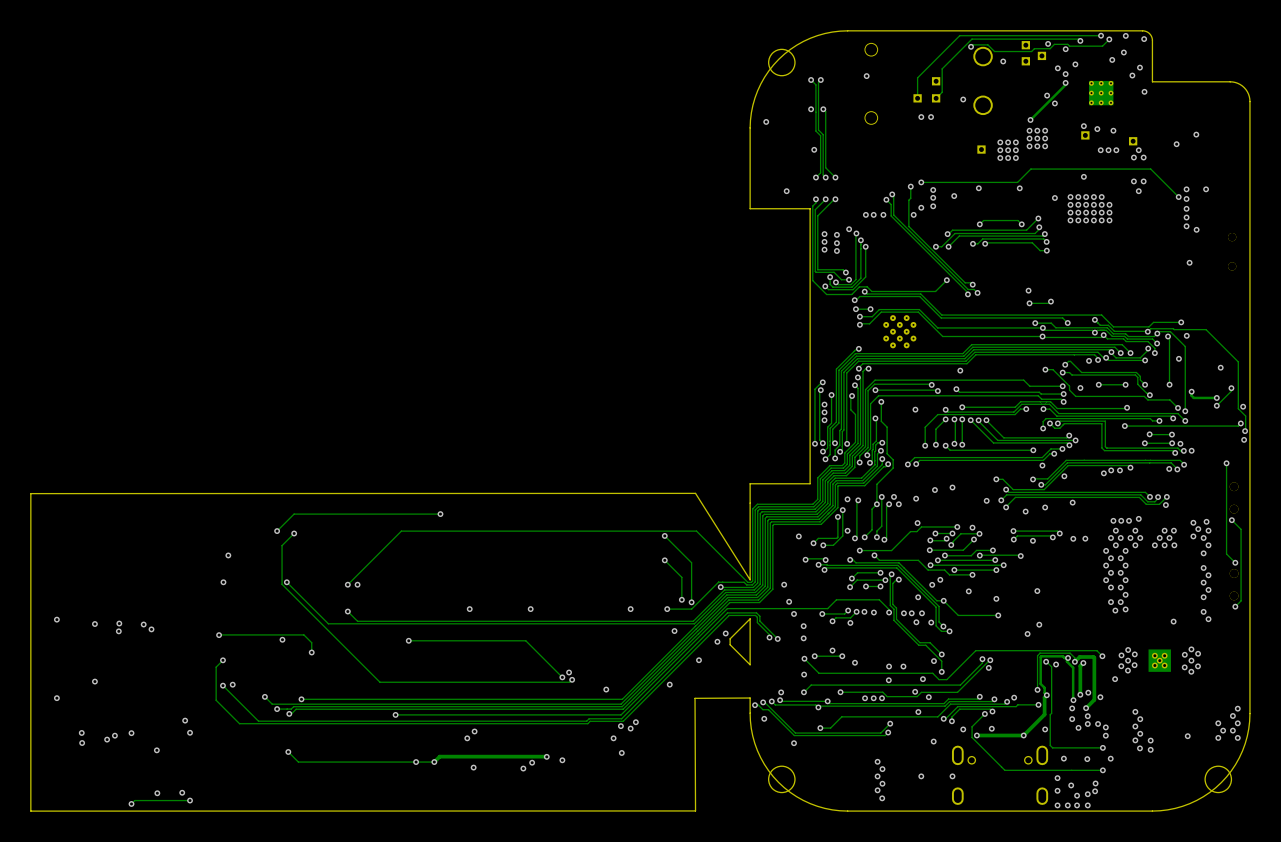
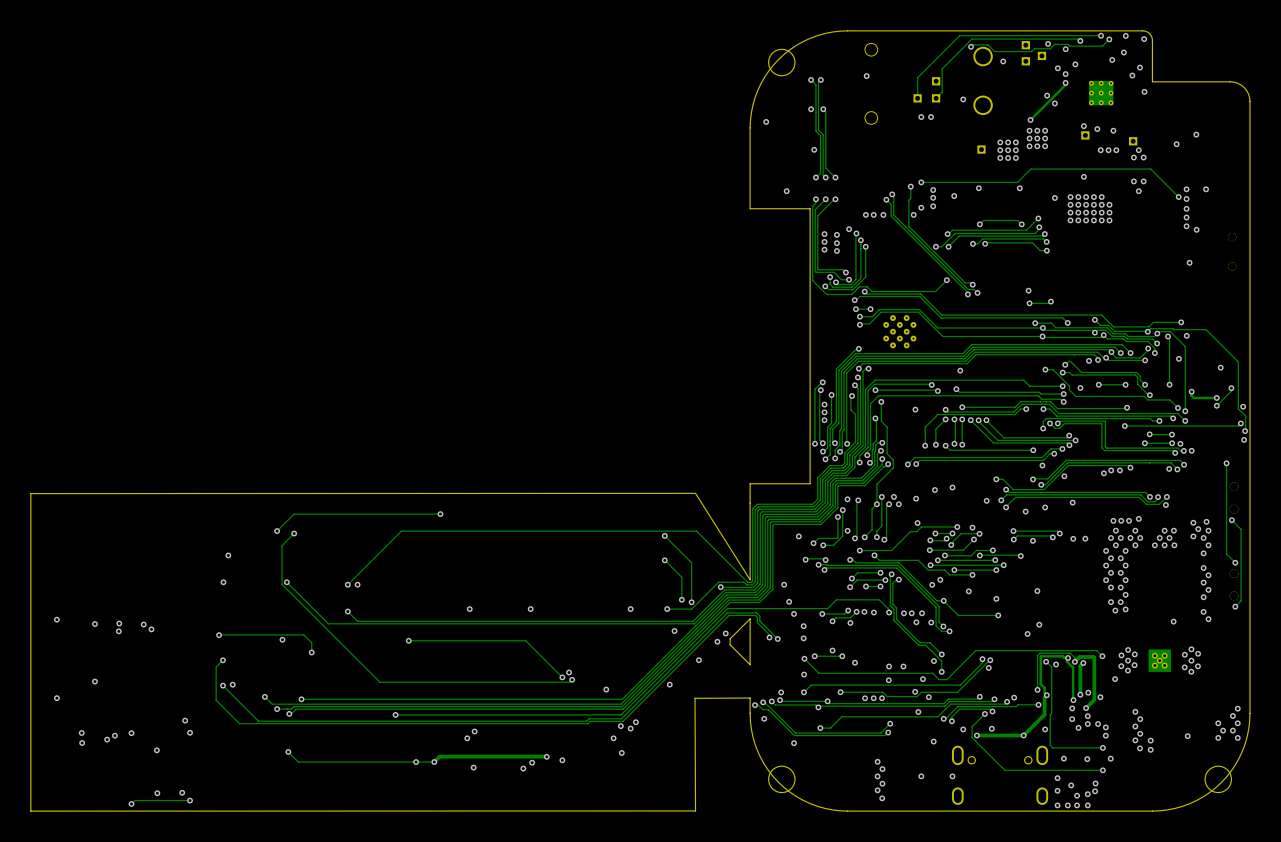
via: (918, 597) -> none

